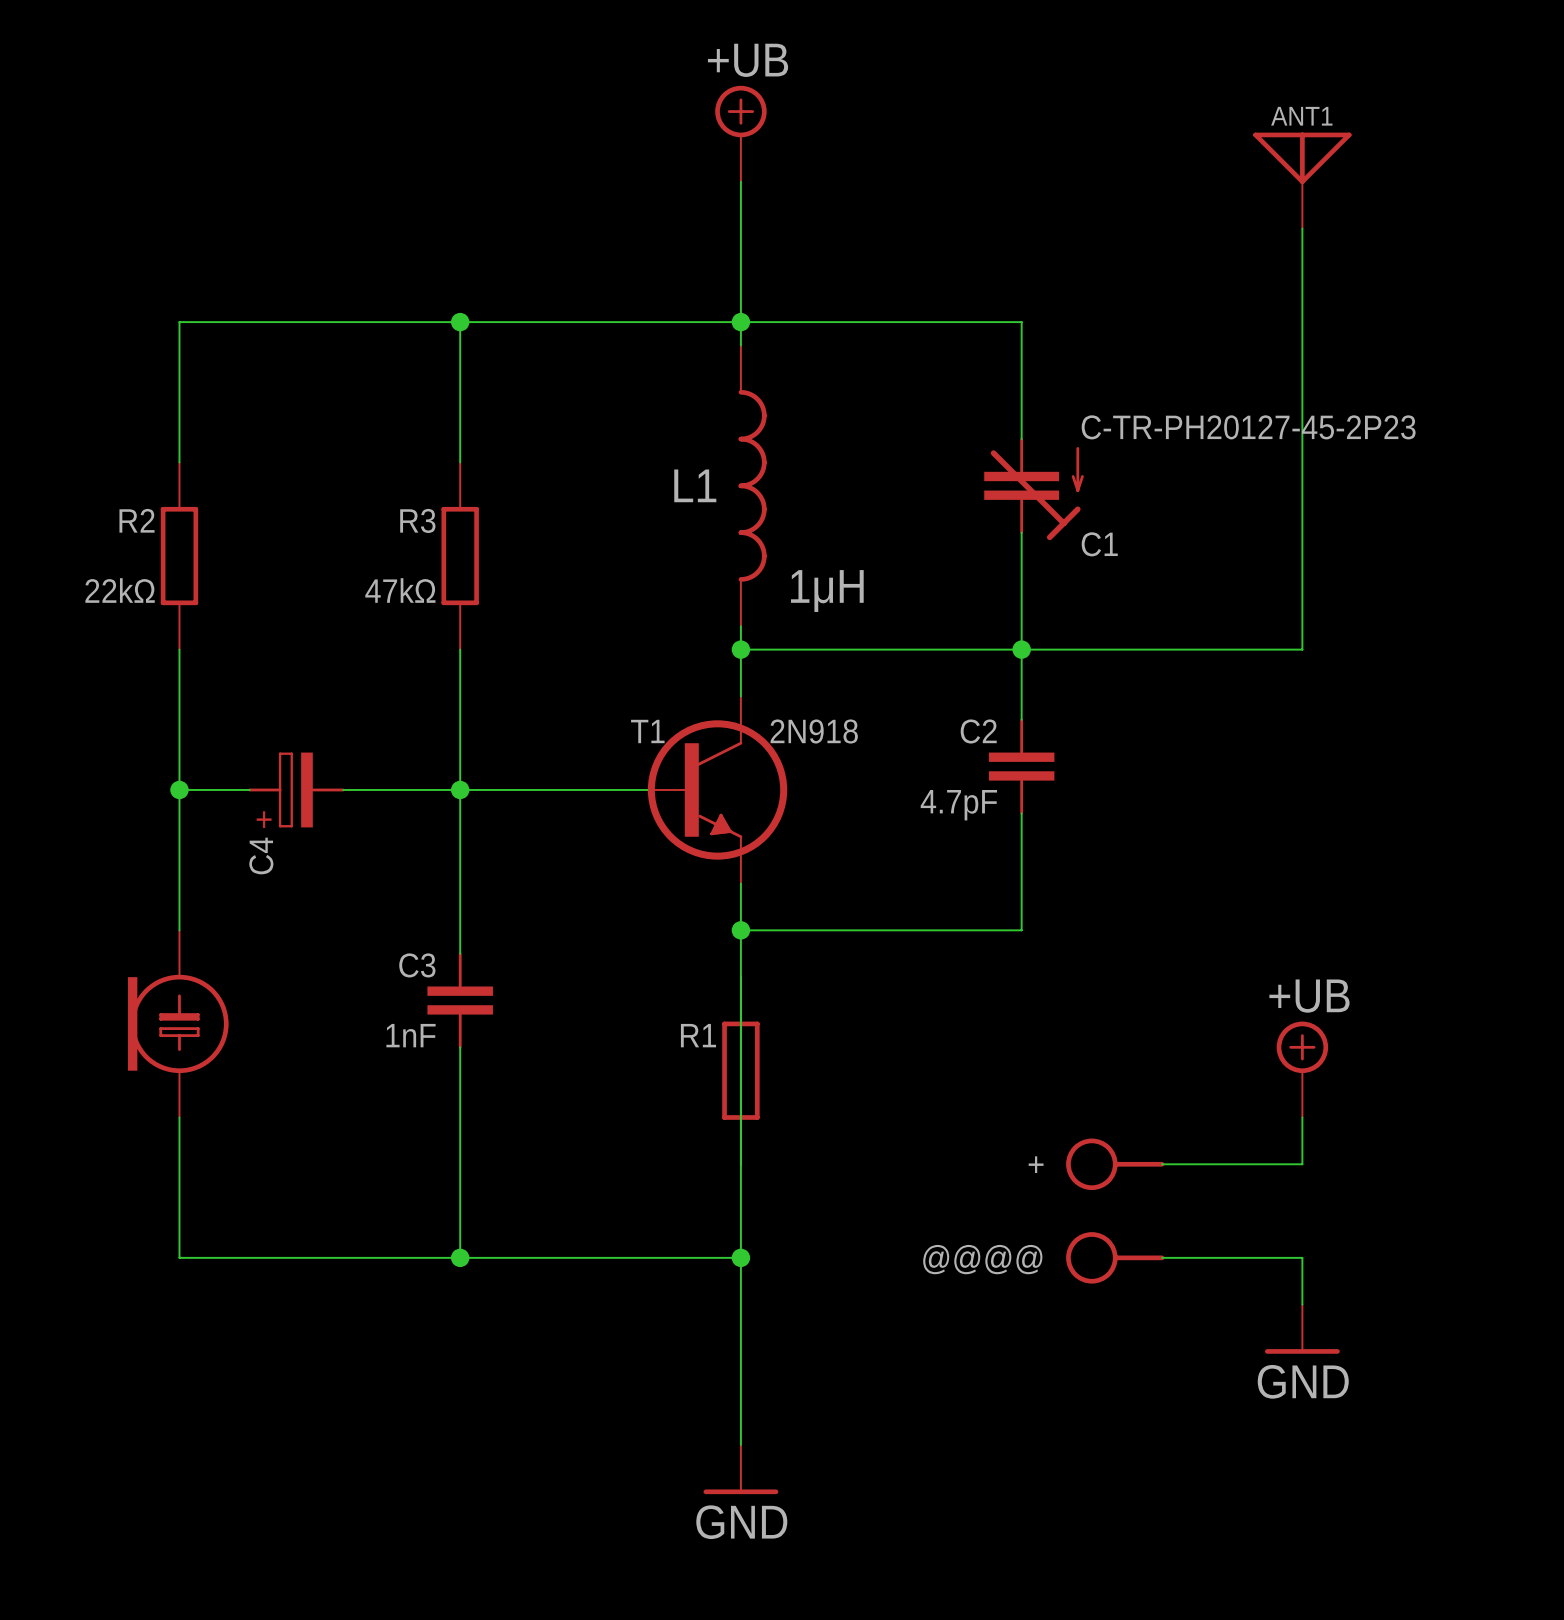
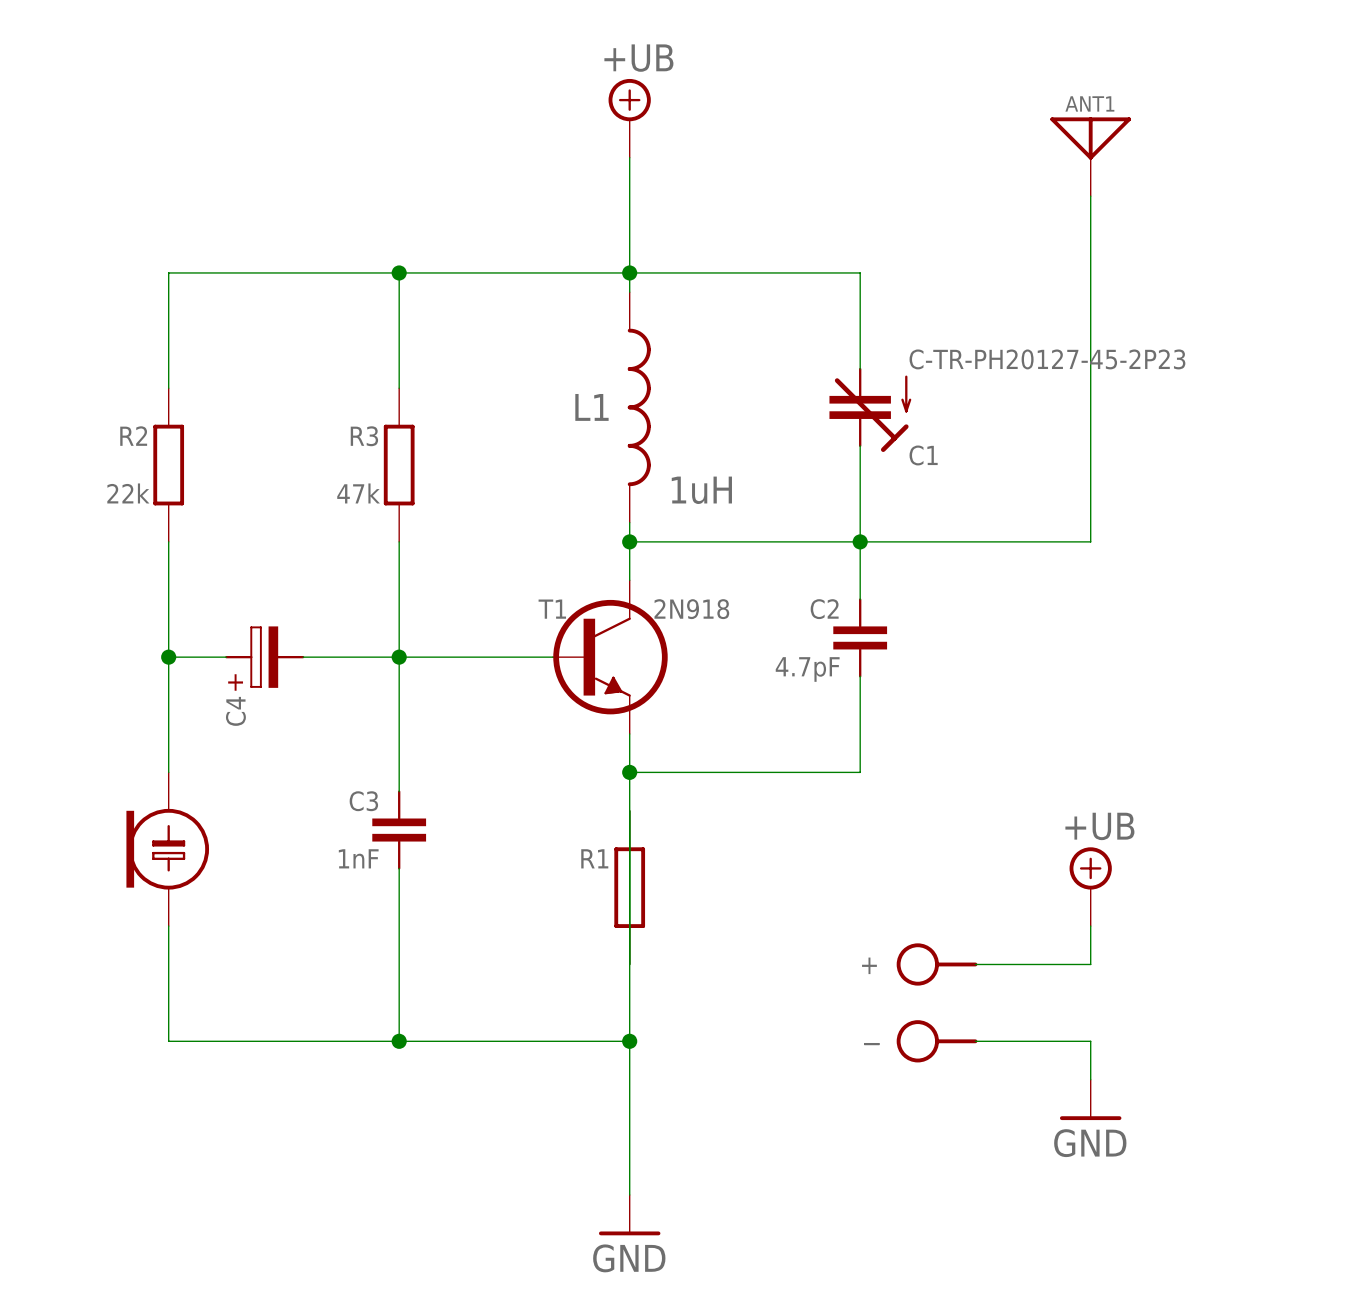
R2 value: 22kΩ (120, 590) -> 22k (128, 493)
R3 value: 47kΩ (400, 590) -> 47k (358, 493)
L1 value: 1μH (827, 591) -> 1uH (701, 490)
part name: @@@@ (982, 1259) -> ̶̶ (871, 1044)

